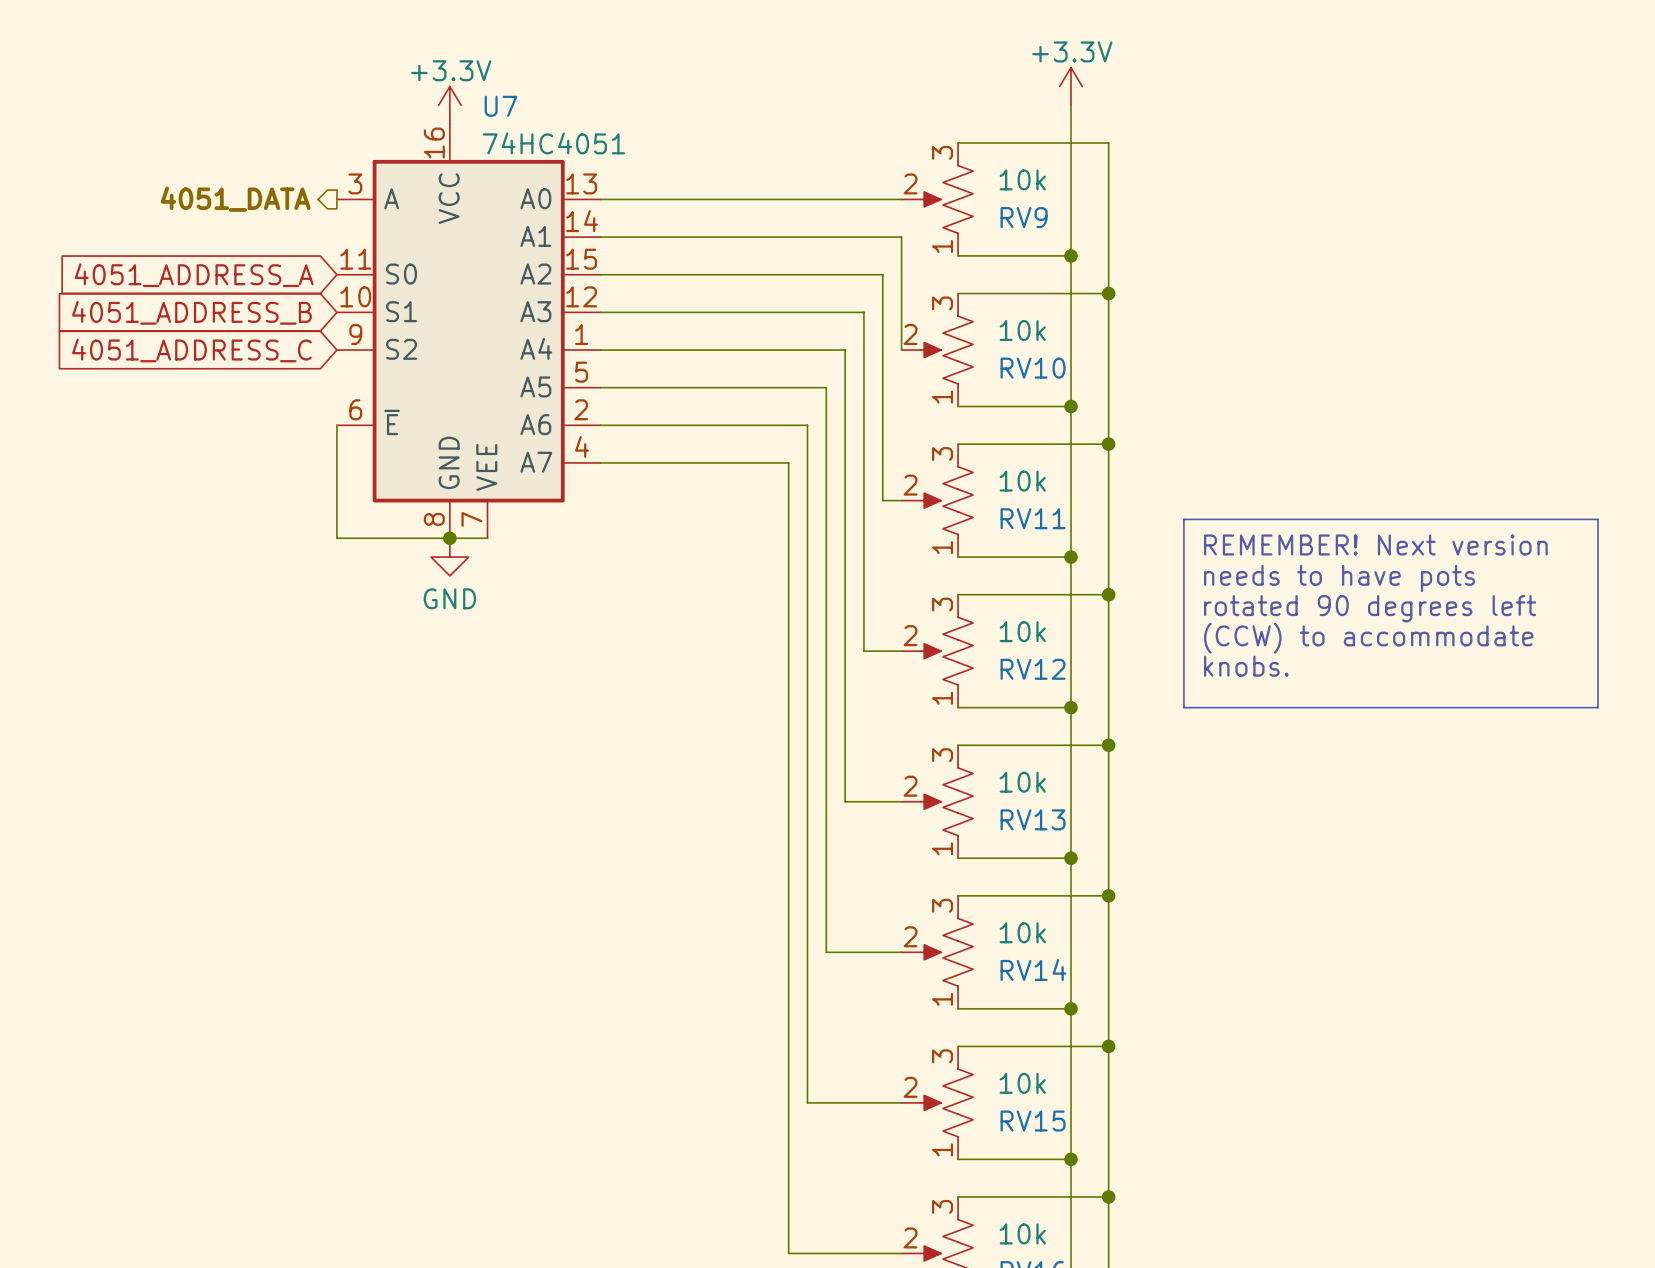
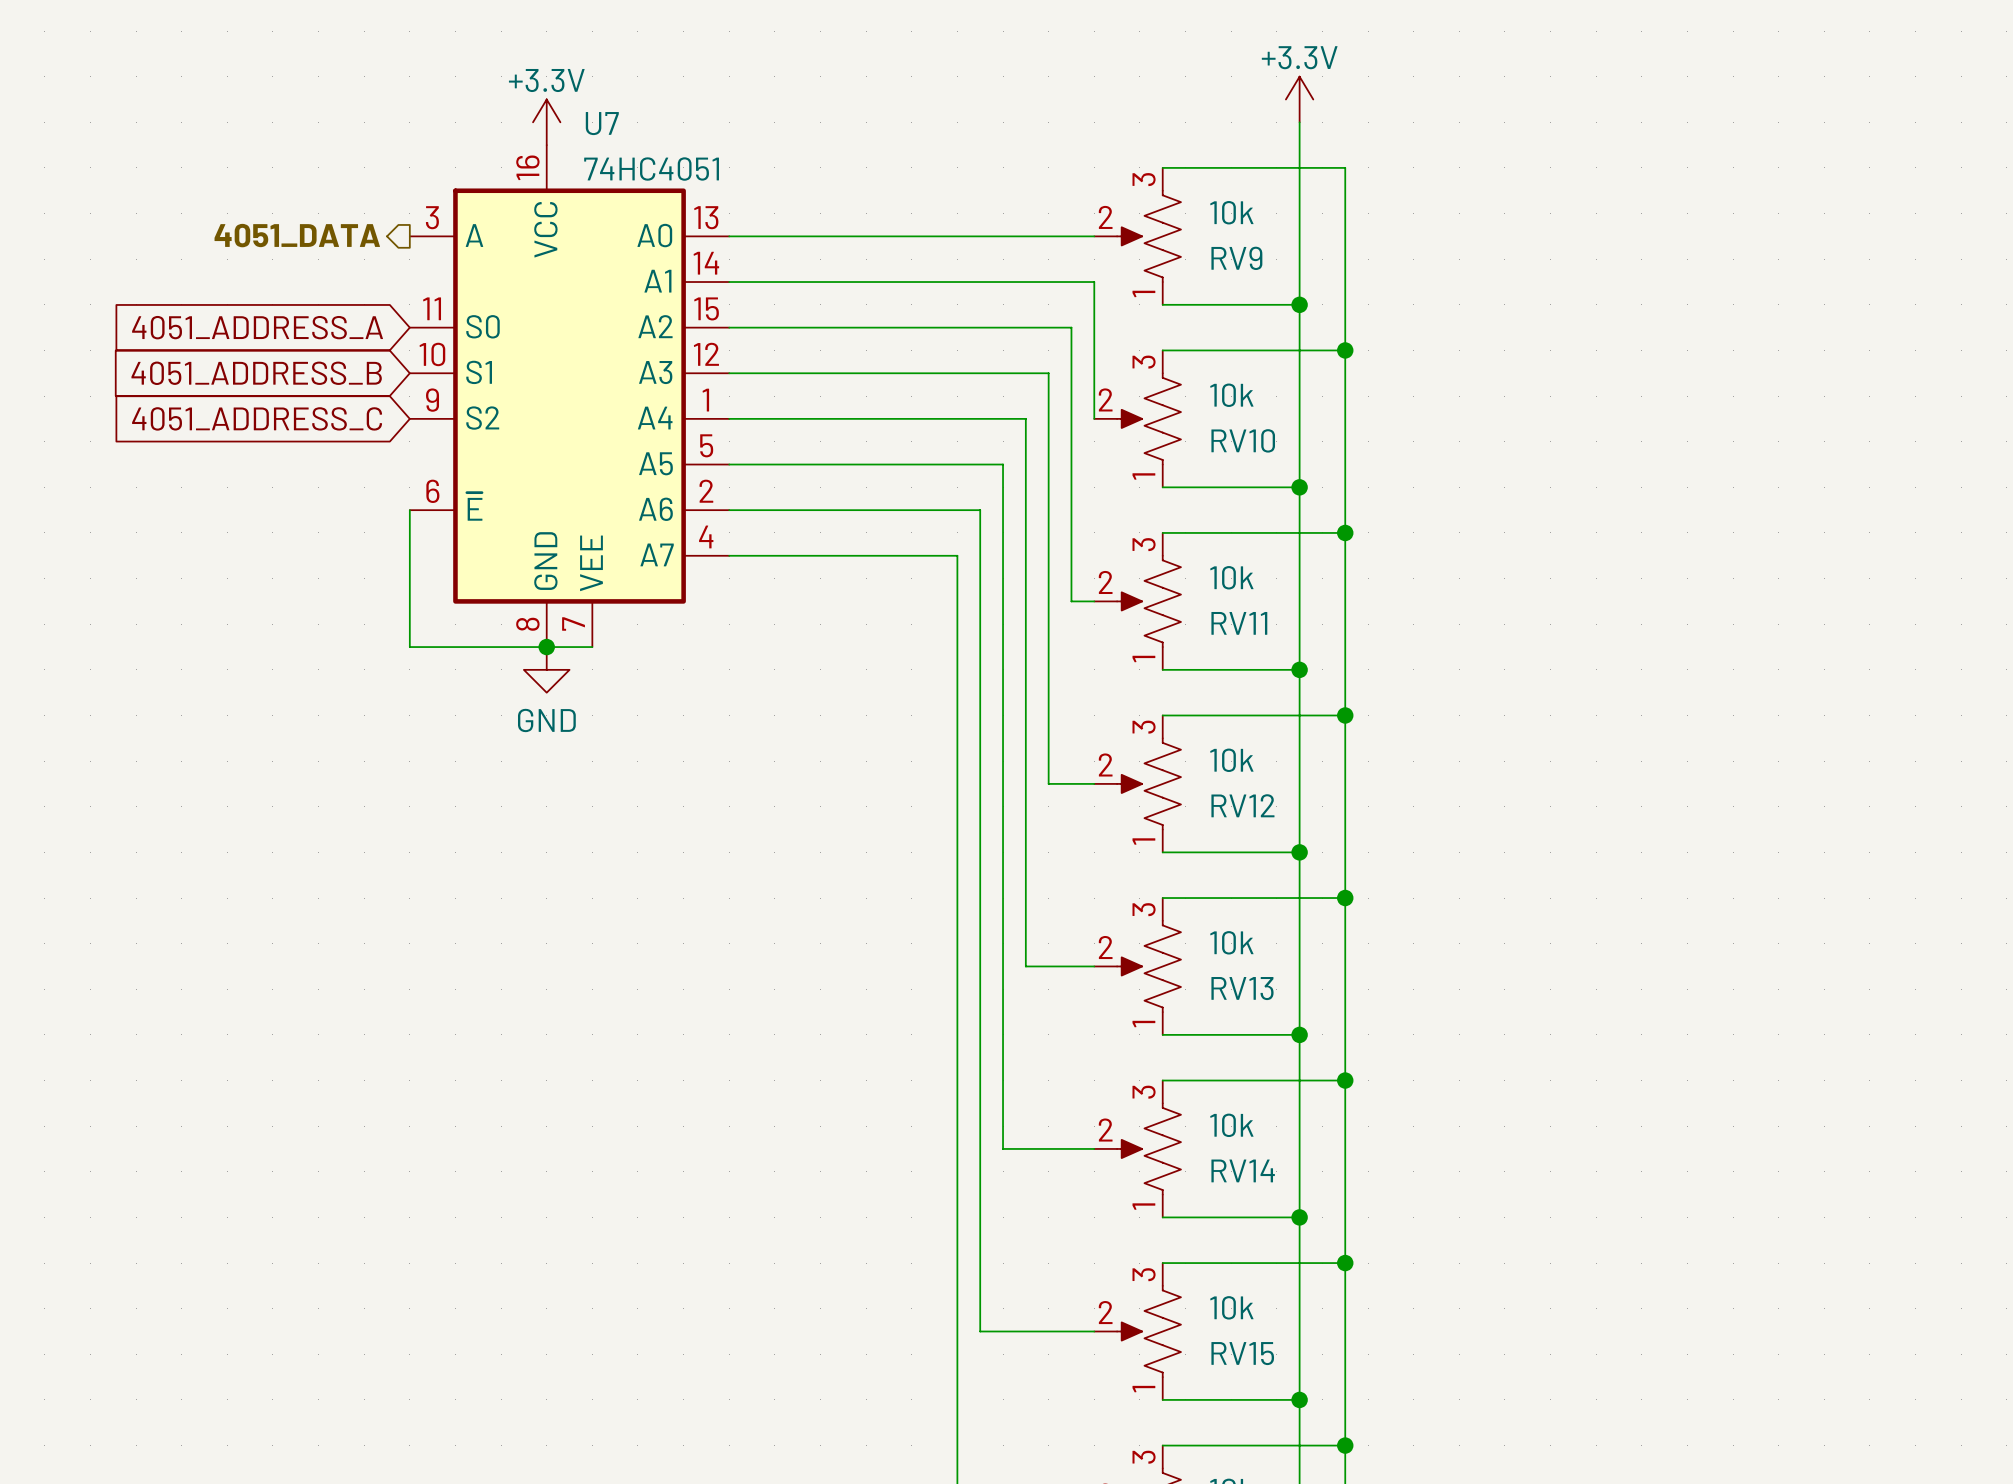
line: (1183, 519) (1598, 519) (1598, 707) (1183, 707) (1183, 519) -> none
text: REMEMBER! Next version (1375, 544) -> none
text: needs to have pots (1339, 578) -> none
text: rotated 90 degrees left (1370, 608) -> none
text: (CCW) to accommodate (1368, 638) -> none
text: knobs. (1246, 666) -> none

